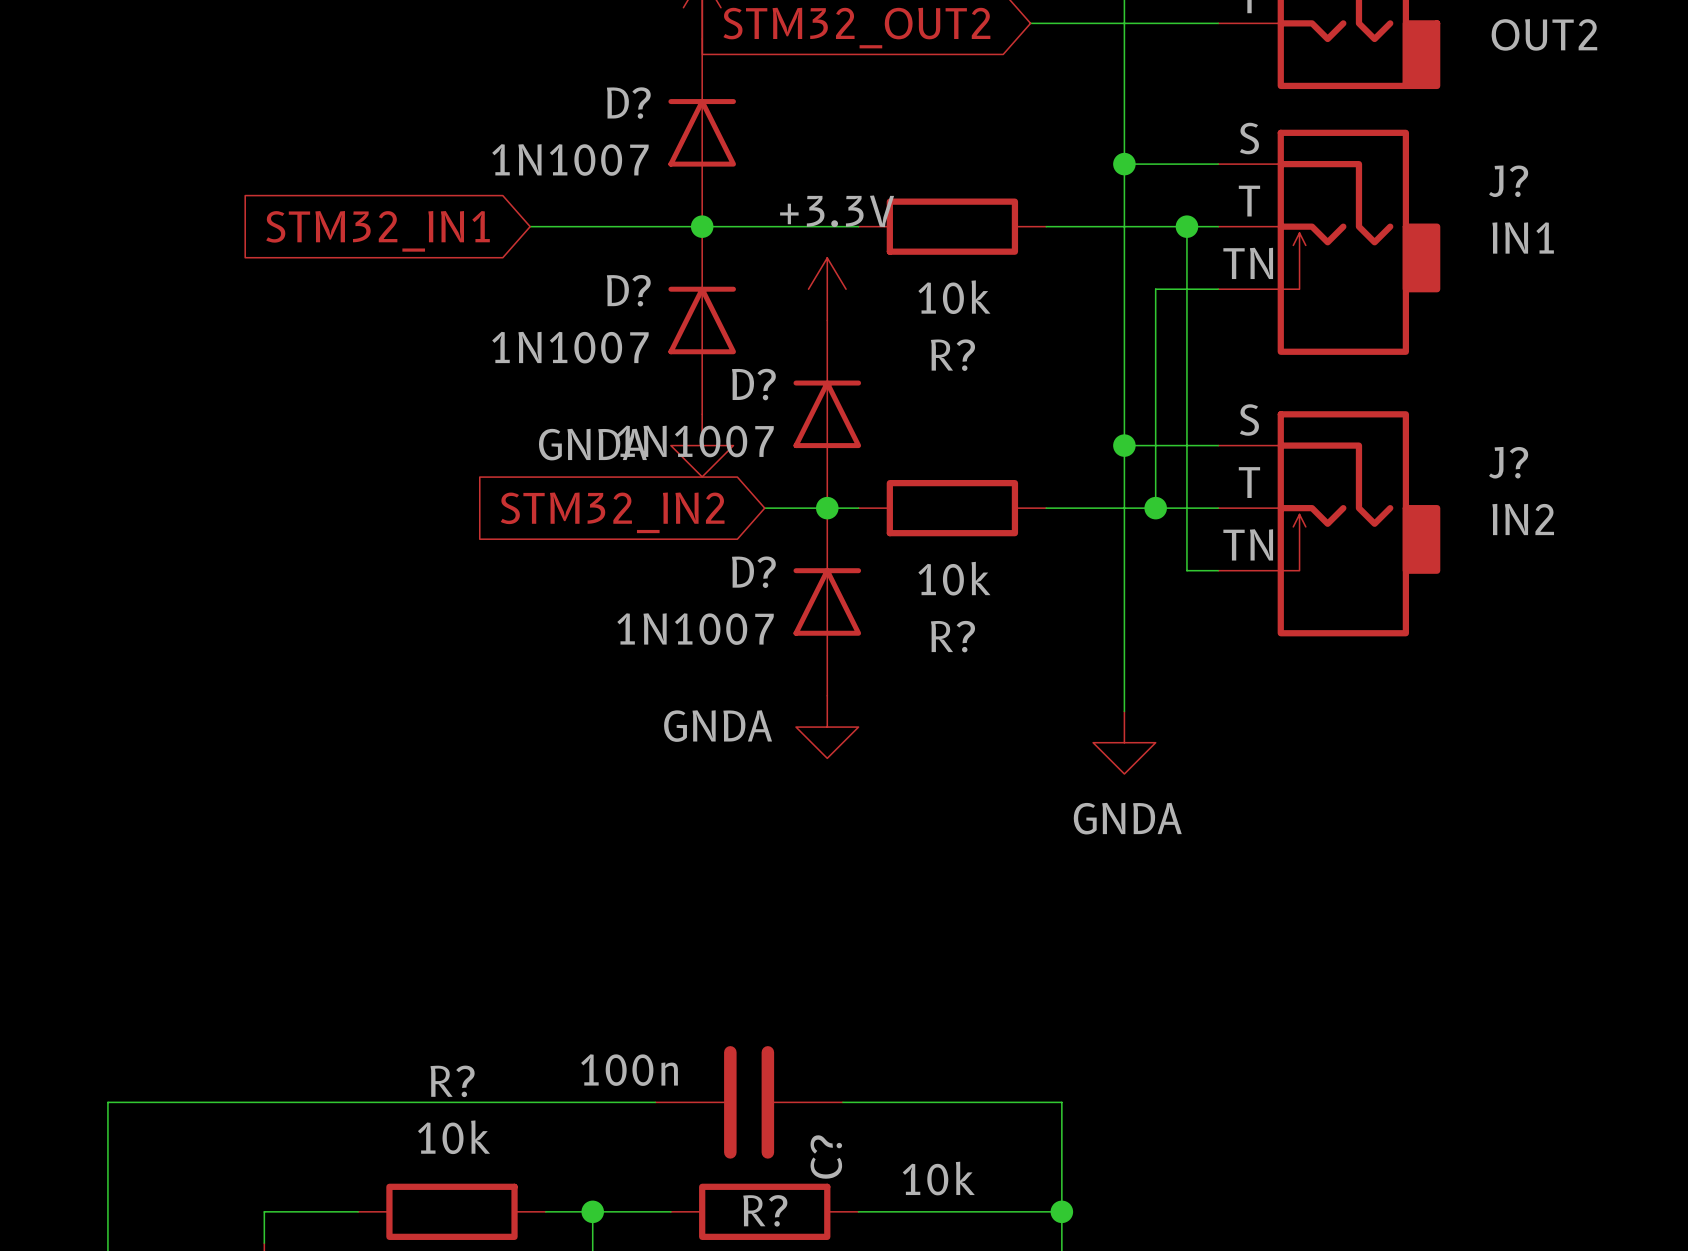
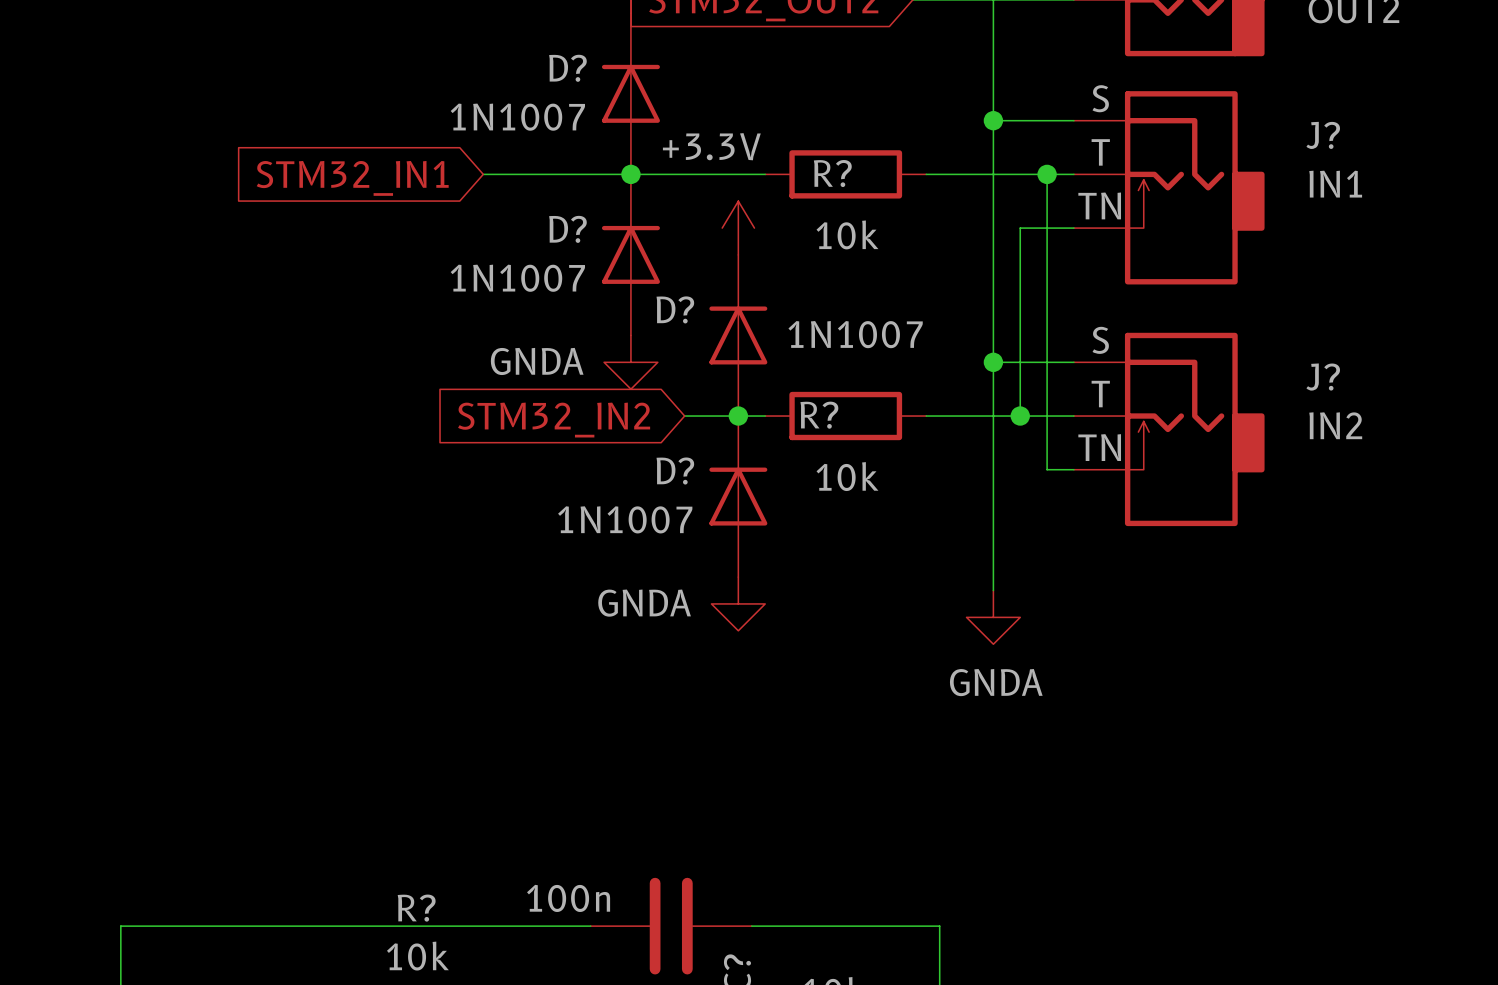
power symbol text position: +3.3V (837, 211) -> +3.3V (711, 146)
R? name position: R? (952, 355) -> R? (832, 173)
D? value position: 1N1007 (695, 441) -> 1N1007 (855, 334)
R? name position: R? (952, 636) -> R? (819, 415)

